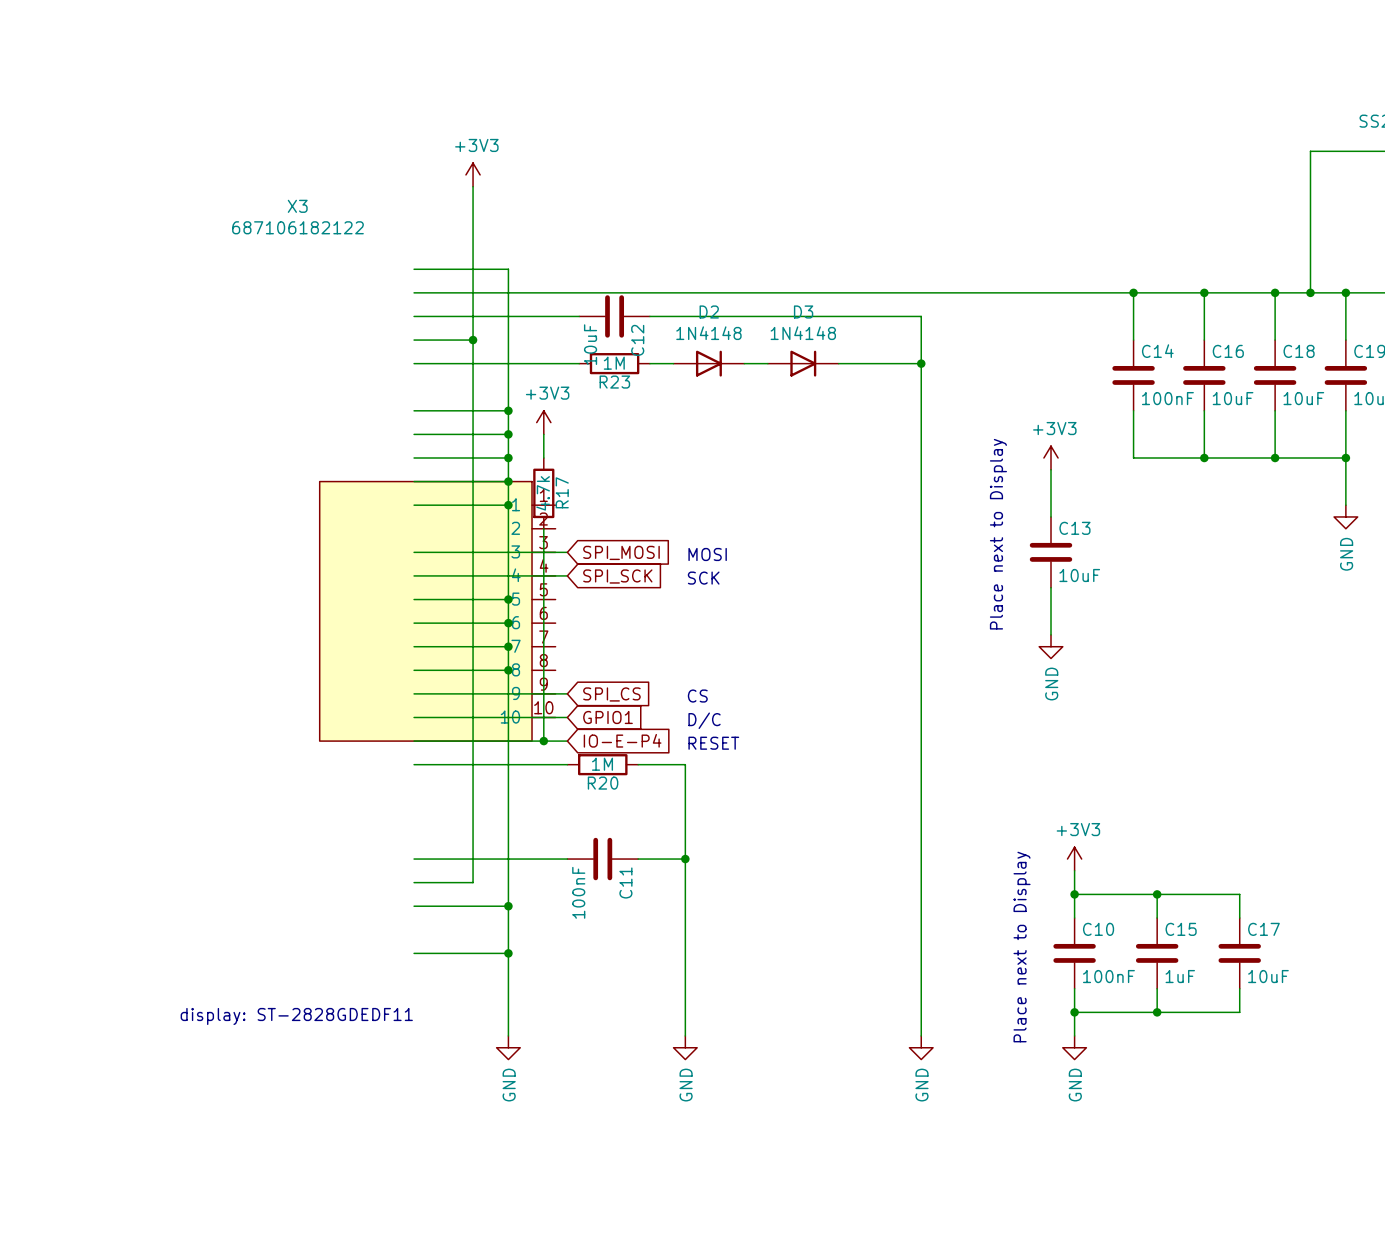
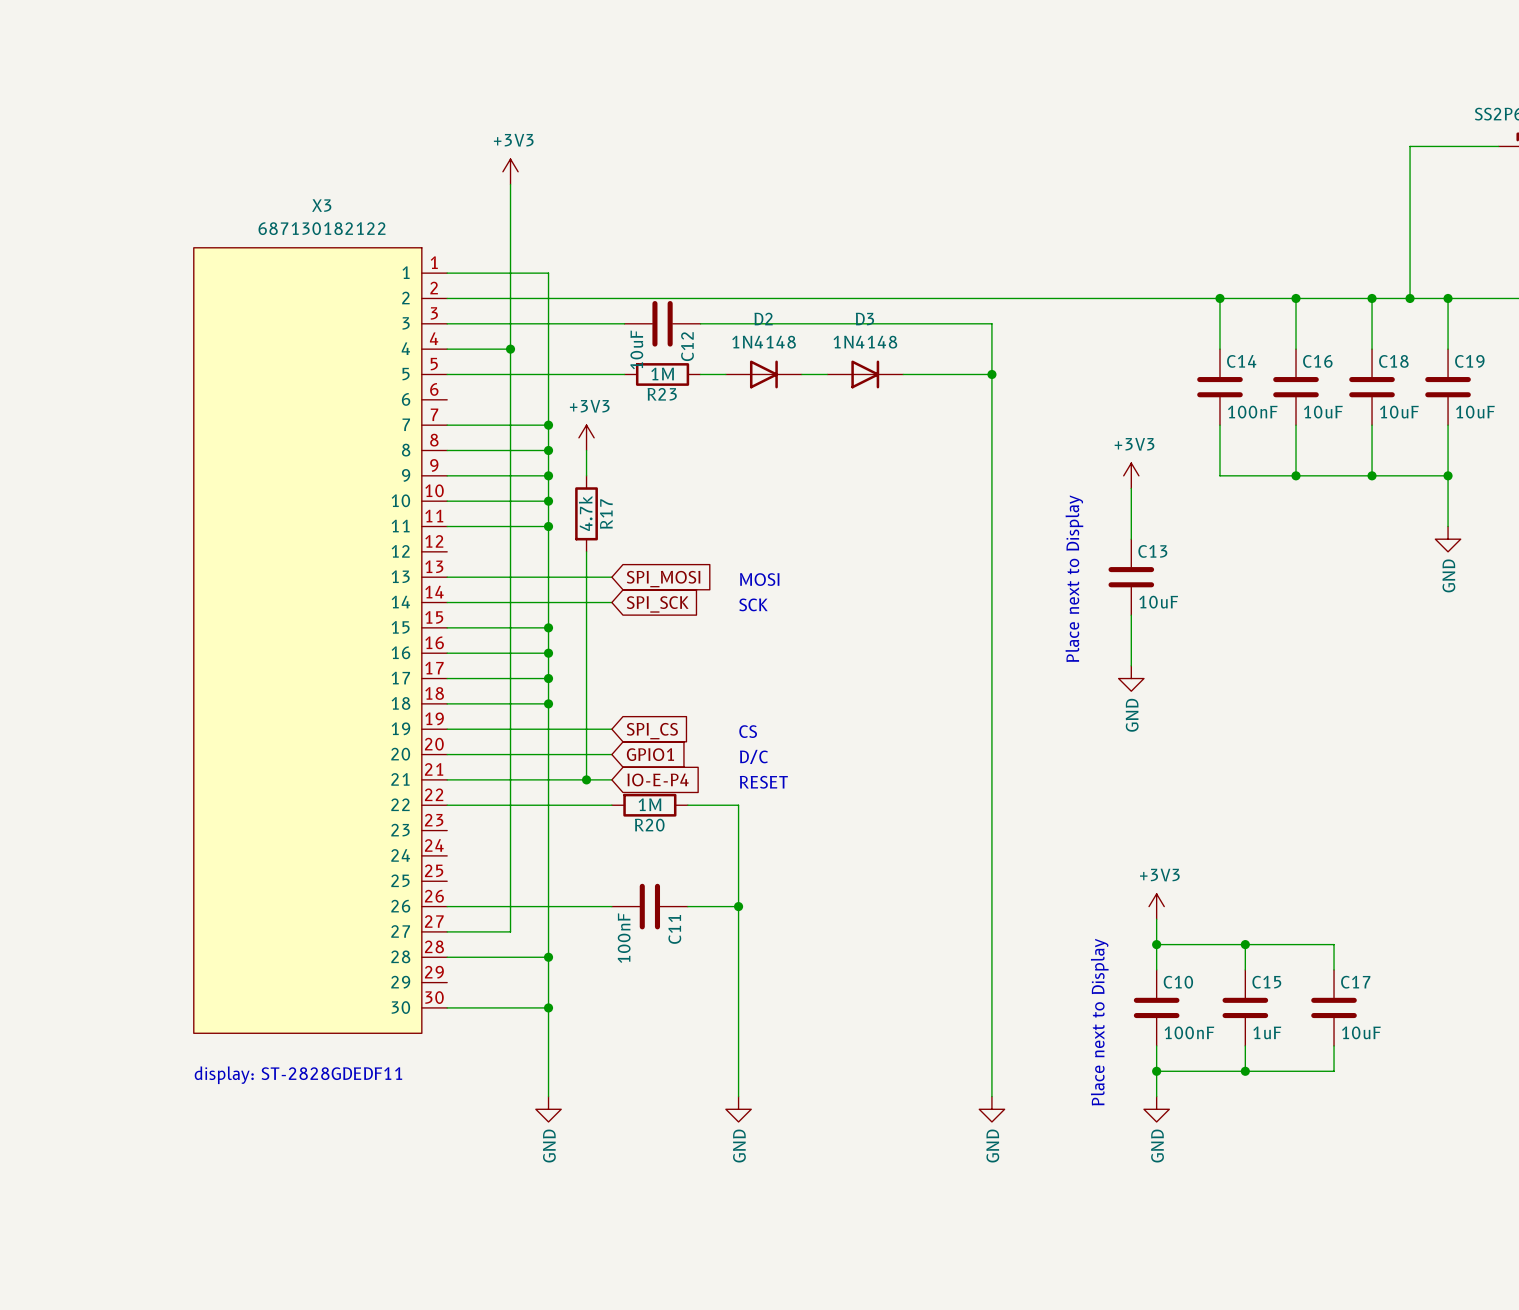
X3 value: 687106182122 (297, 227) -> 687130182122 (322, 228)
X3 symbol: [319, 481, 556, 742] -> [193, 247, 448, 1034]

